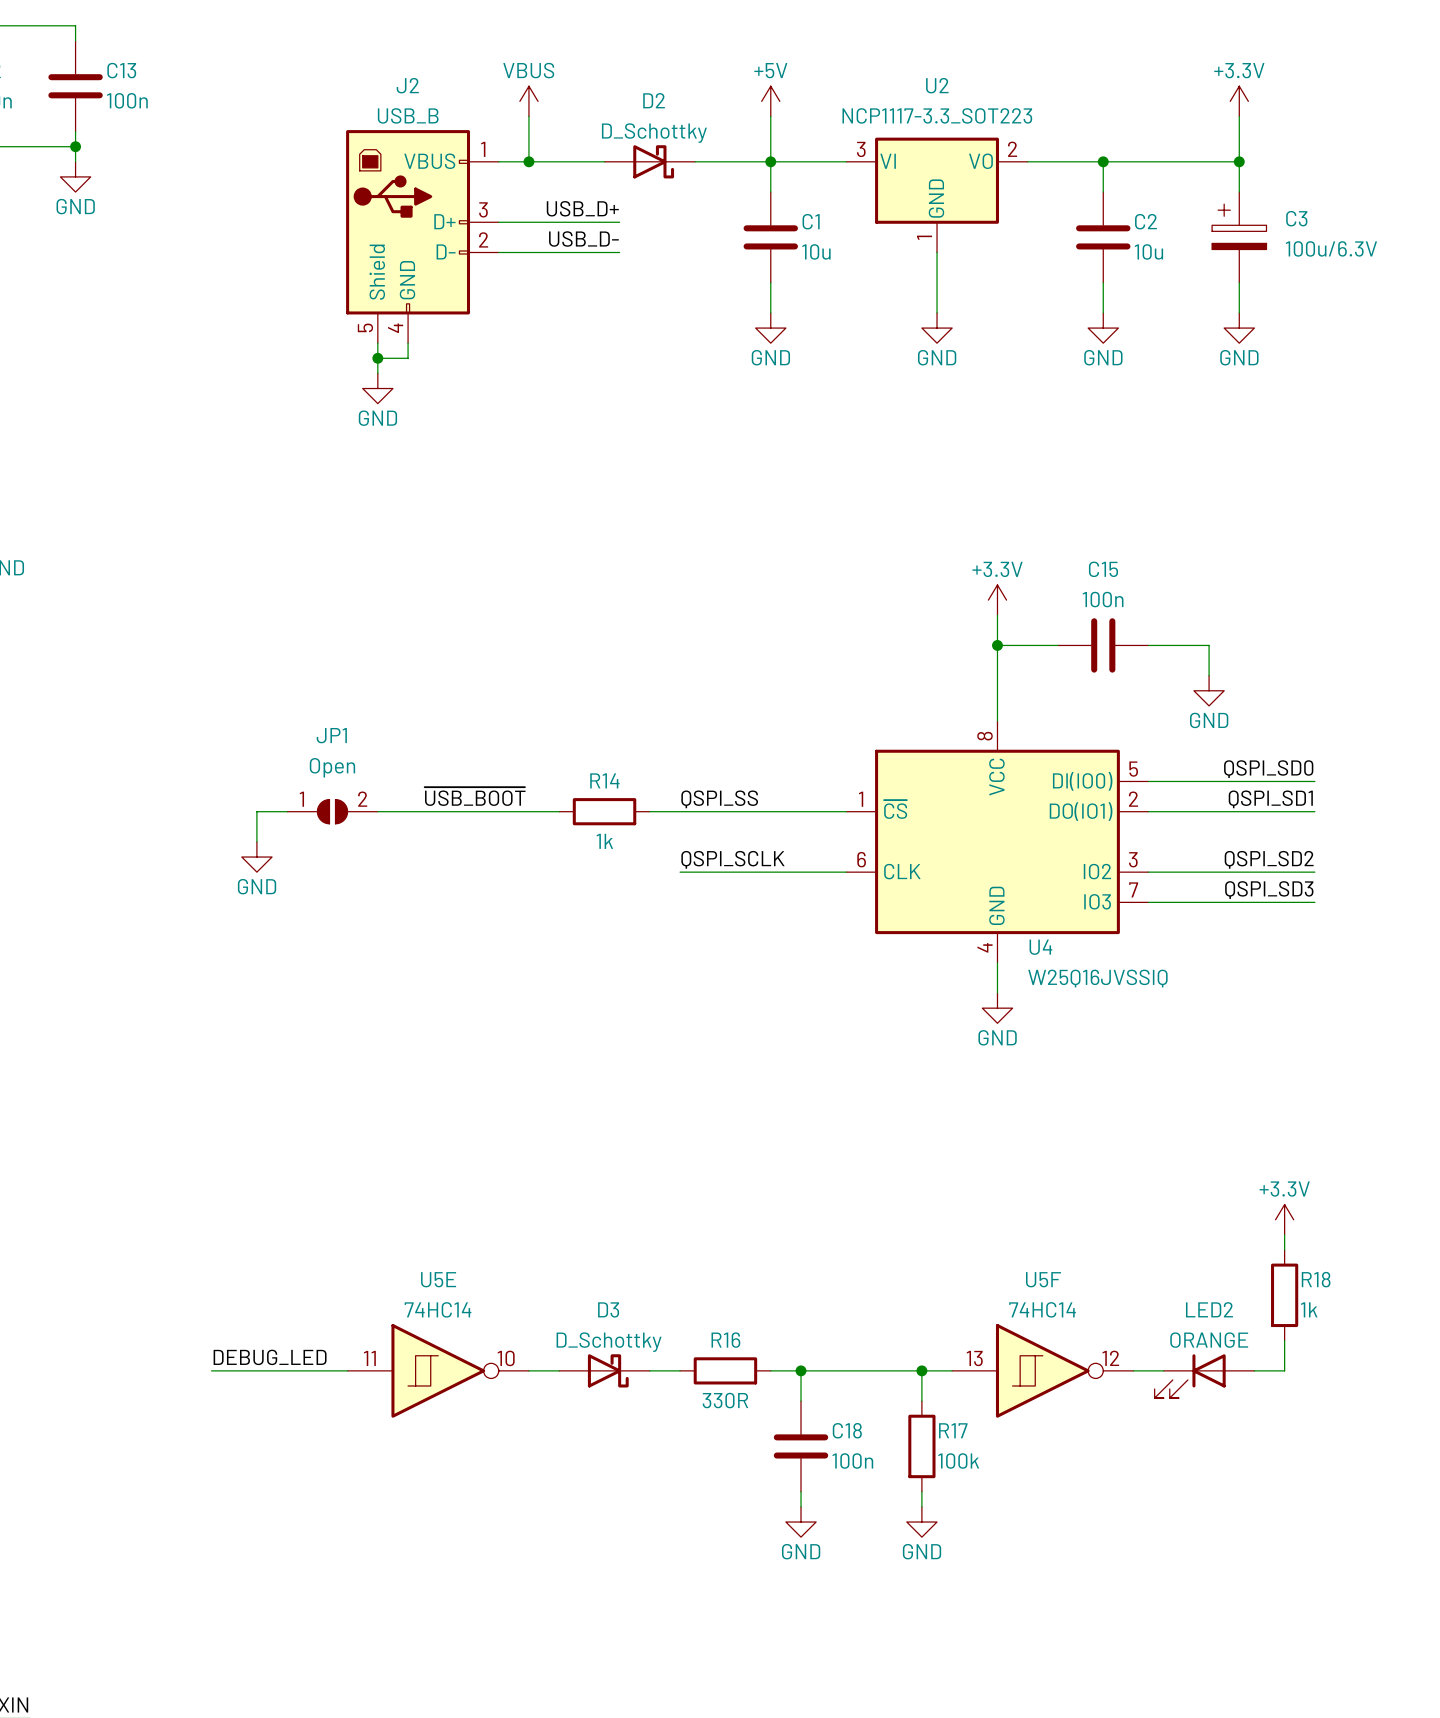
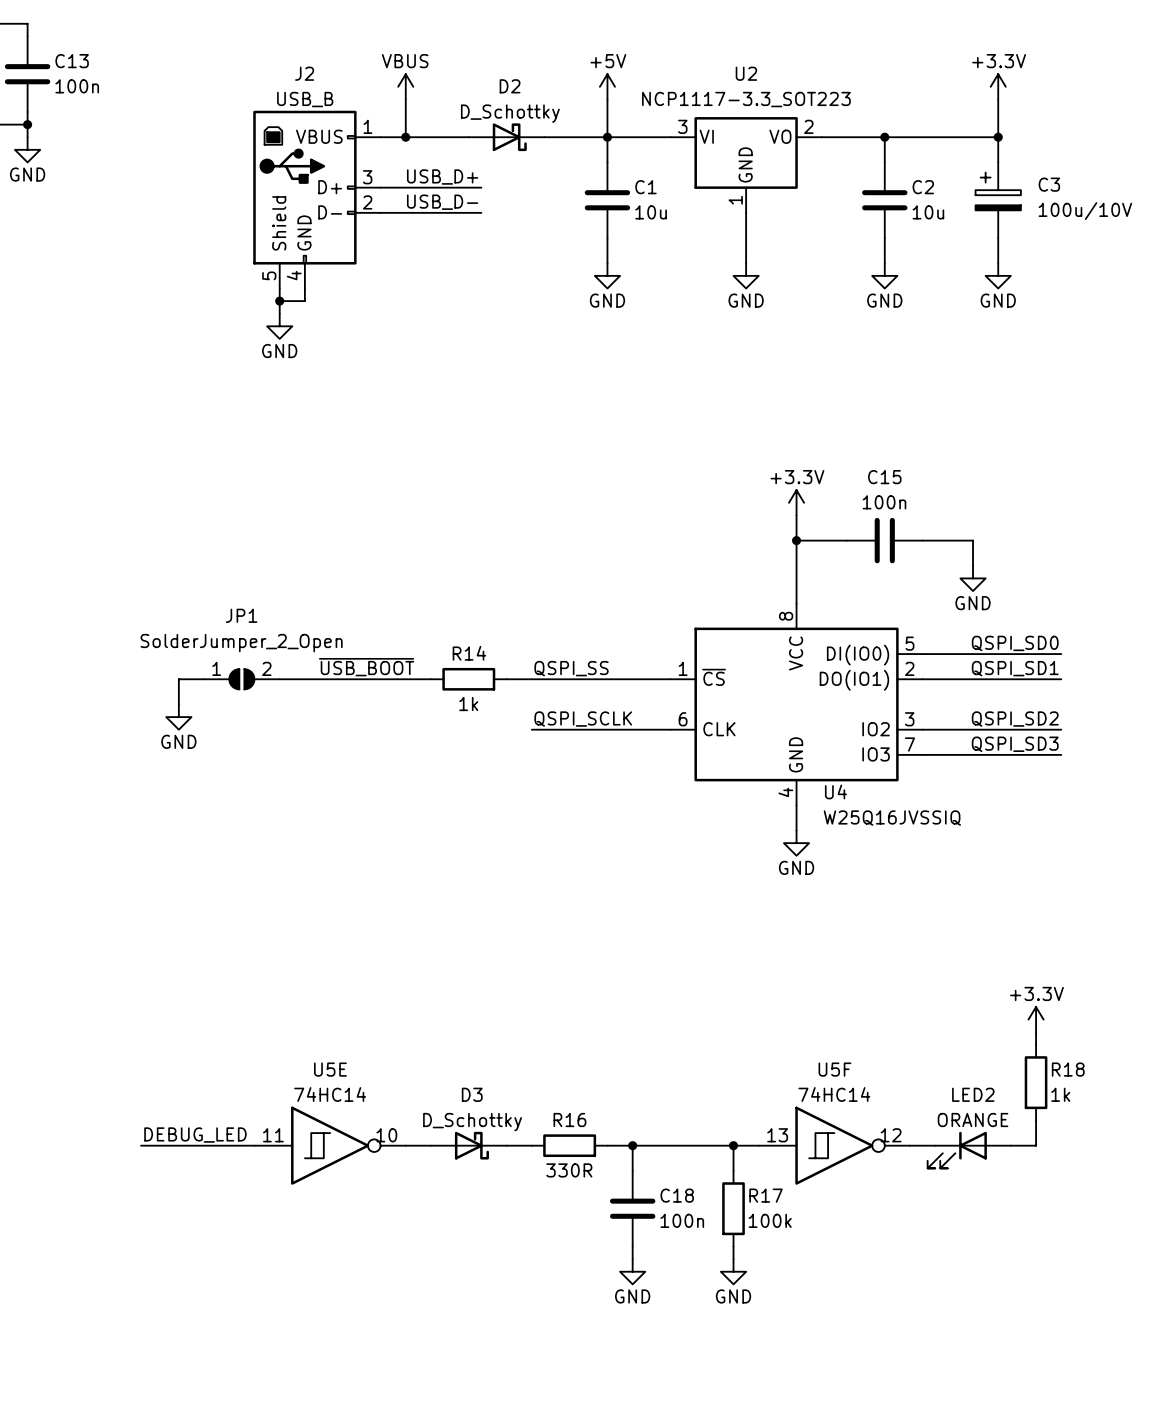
C3 value: 100u/6.3V (1331, 248) -> 100u/10V (1085, 211)
JP1 value: Open (332, 767) -> SolderJumper_2_Open (241, 643)

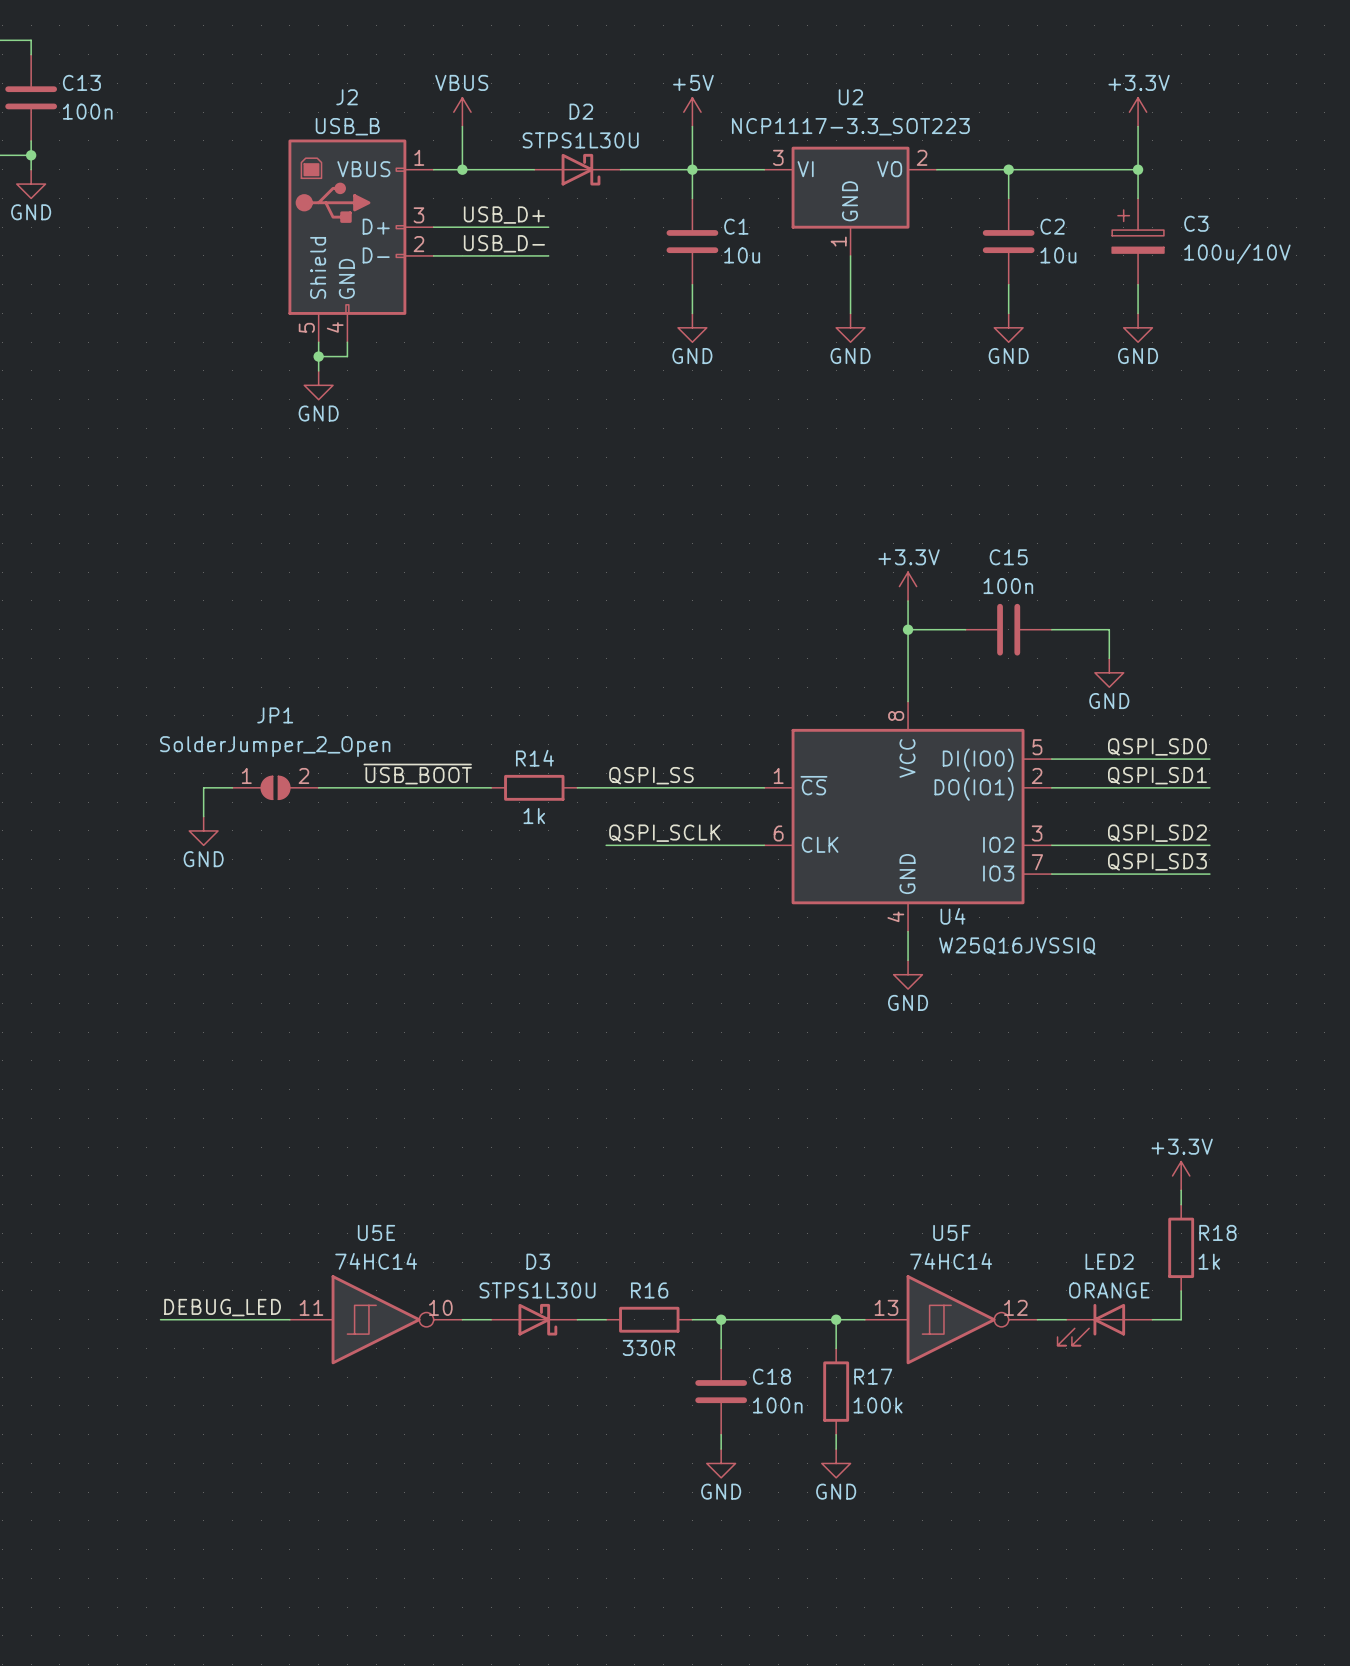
D2 value: D_Schottky (510, 113) -> STPS1L30U (580, 140)
D3 value: D_Schottky (472, 1122) -> STPS1L30U (537, 1290)

